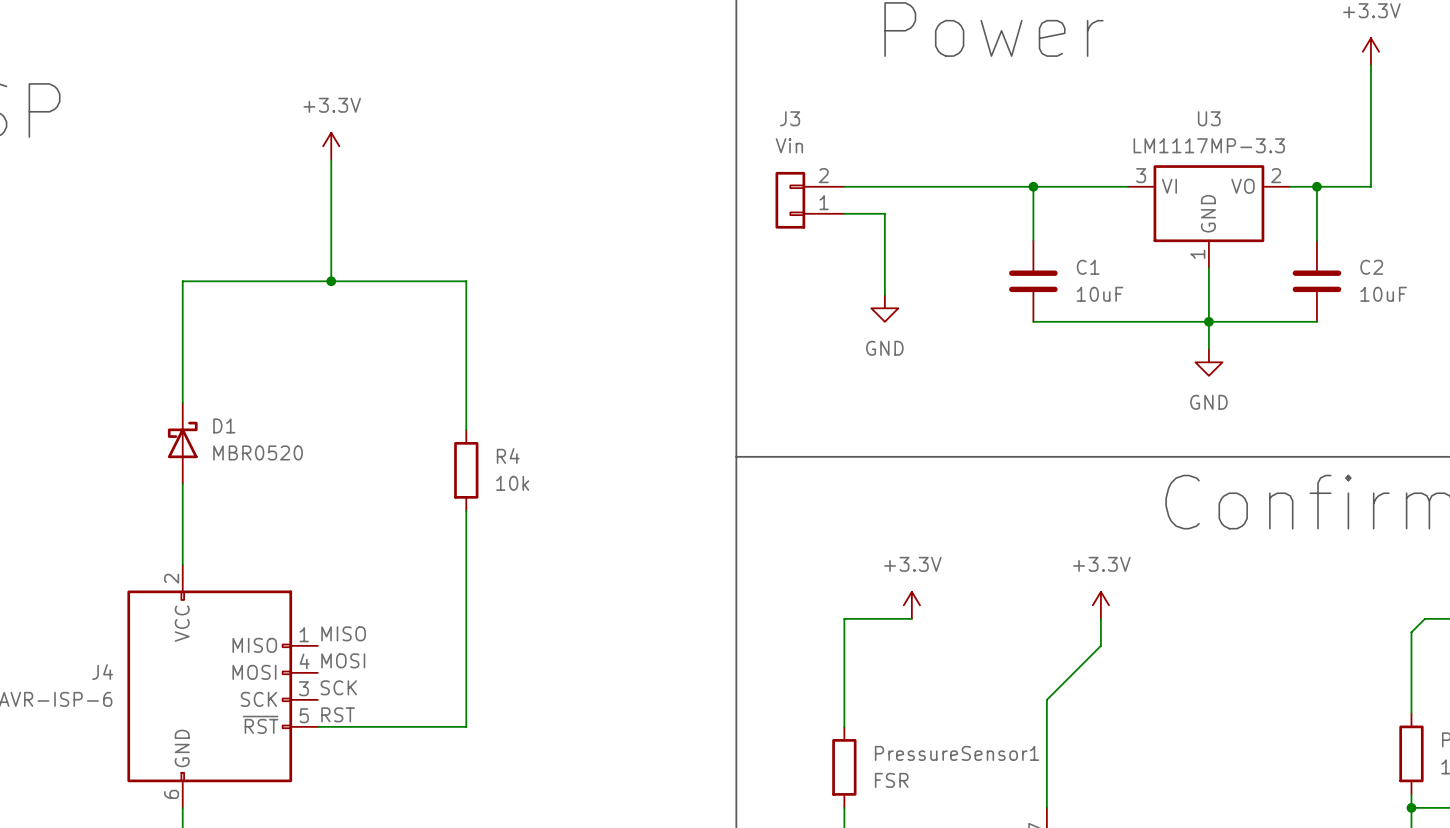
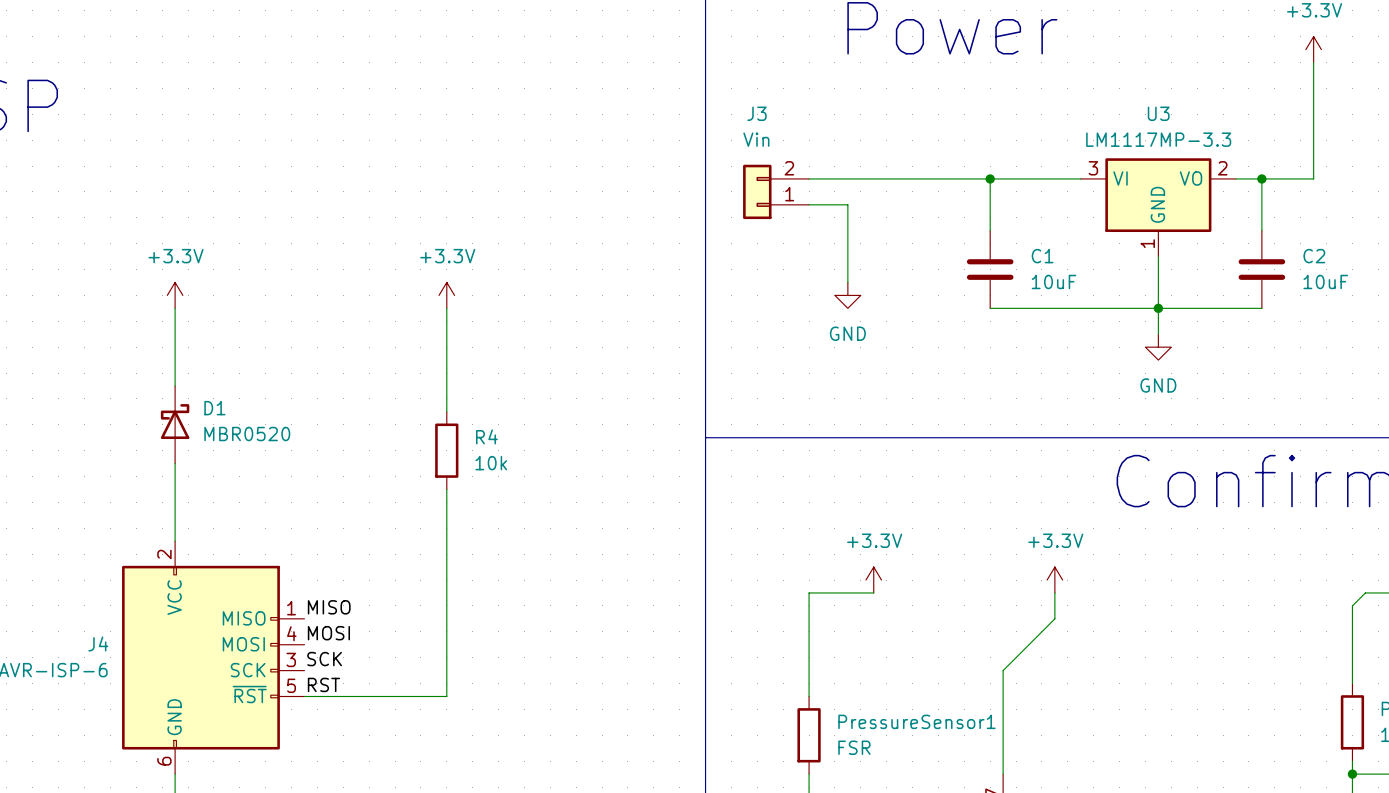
power symbol: +3.3V (331, 146) -> none
wire: (331, 159) (331, 281) -> none
junction: (331, 281) -> none
power symbol: none -> +3.3V (175, 295)
power symbol: none -> +3.3V (446, 295)
wire: (182, 321) (182, 281) (466, 281) (466, 321) -> none

